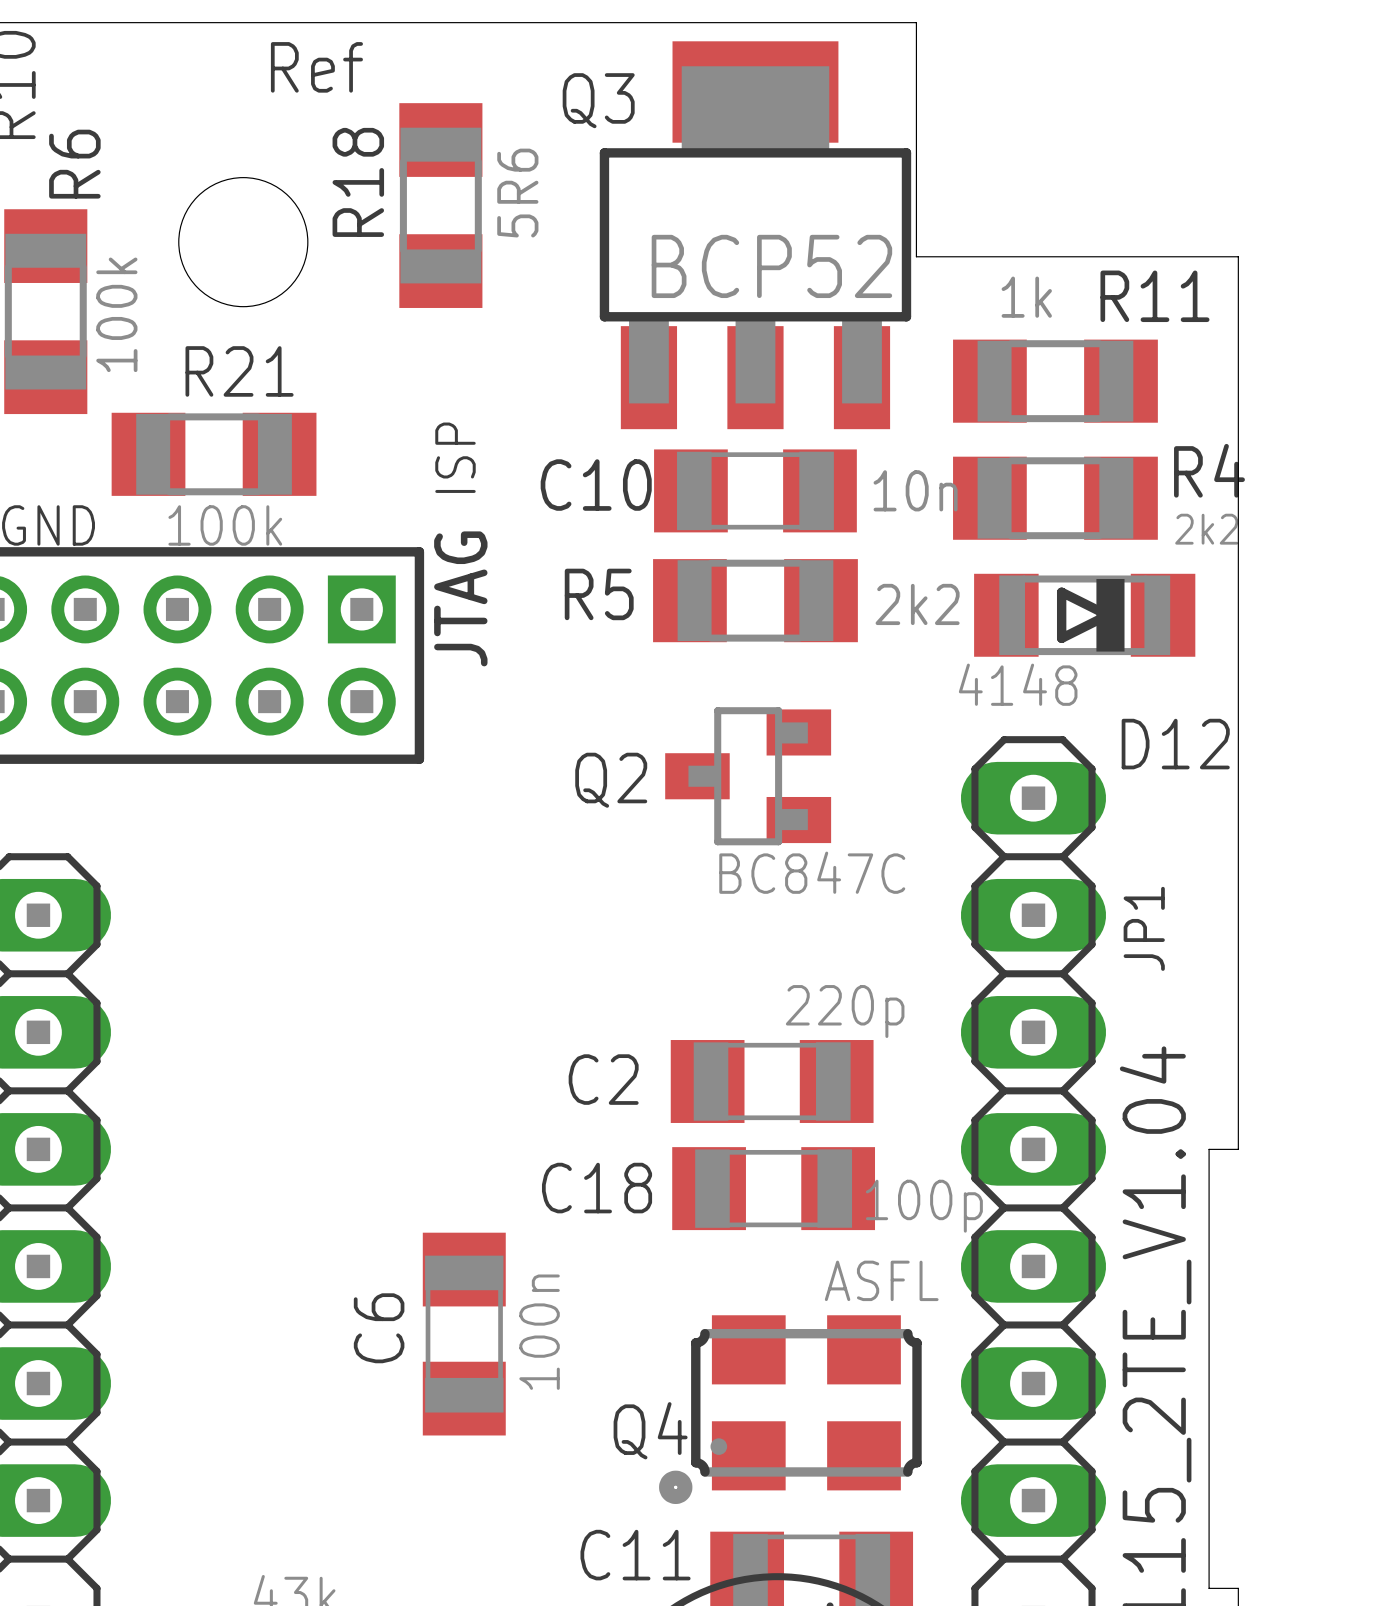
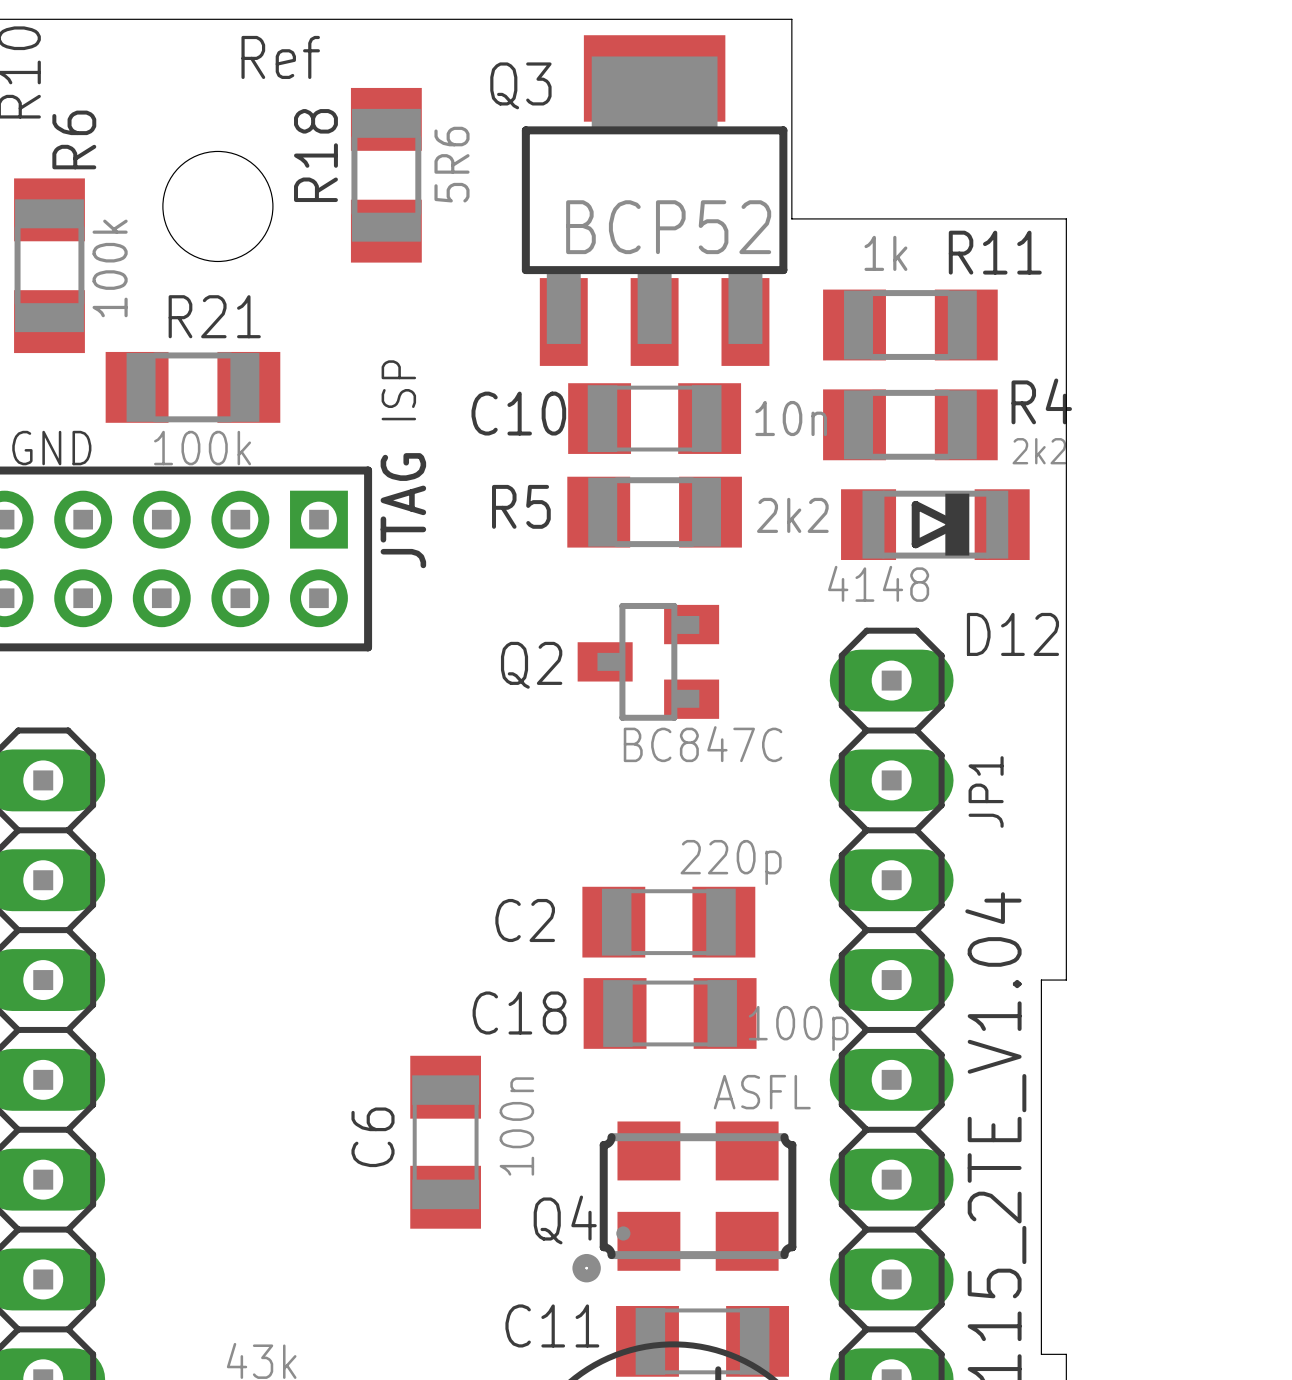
C6 value position: 100n (539, 1332) -> 100n (516, 1126)
C6 position: (464, 1334) -> (445, 1142)

